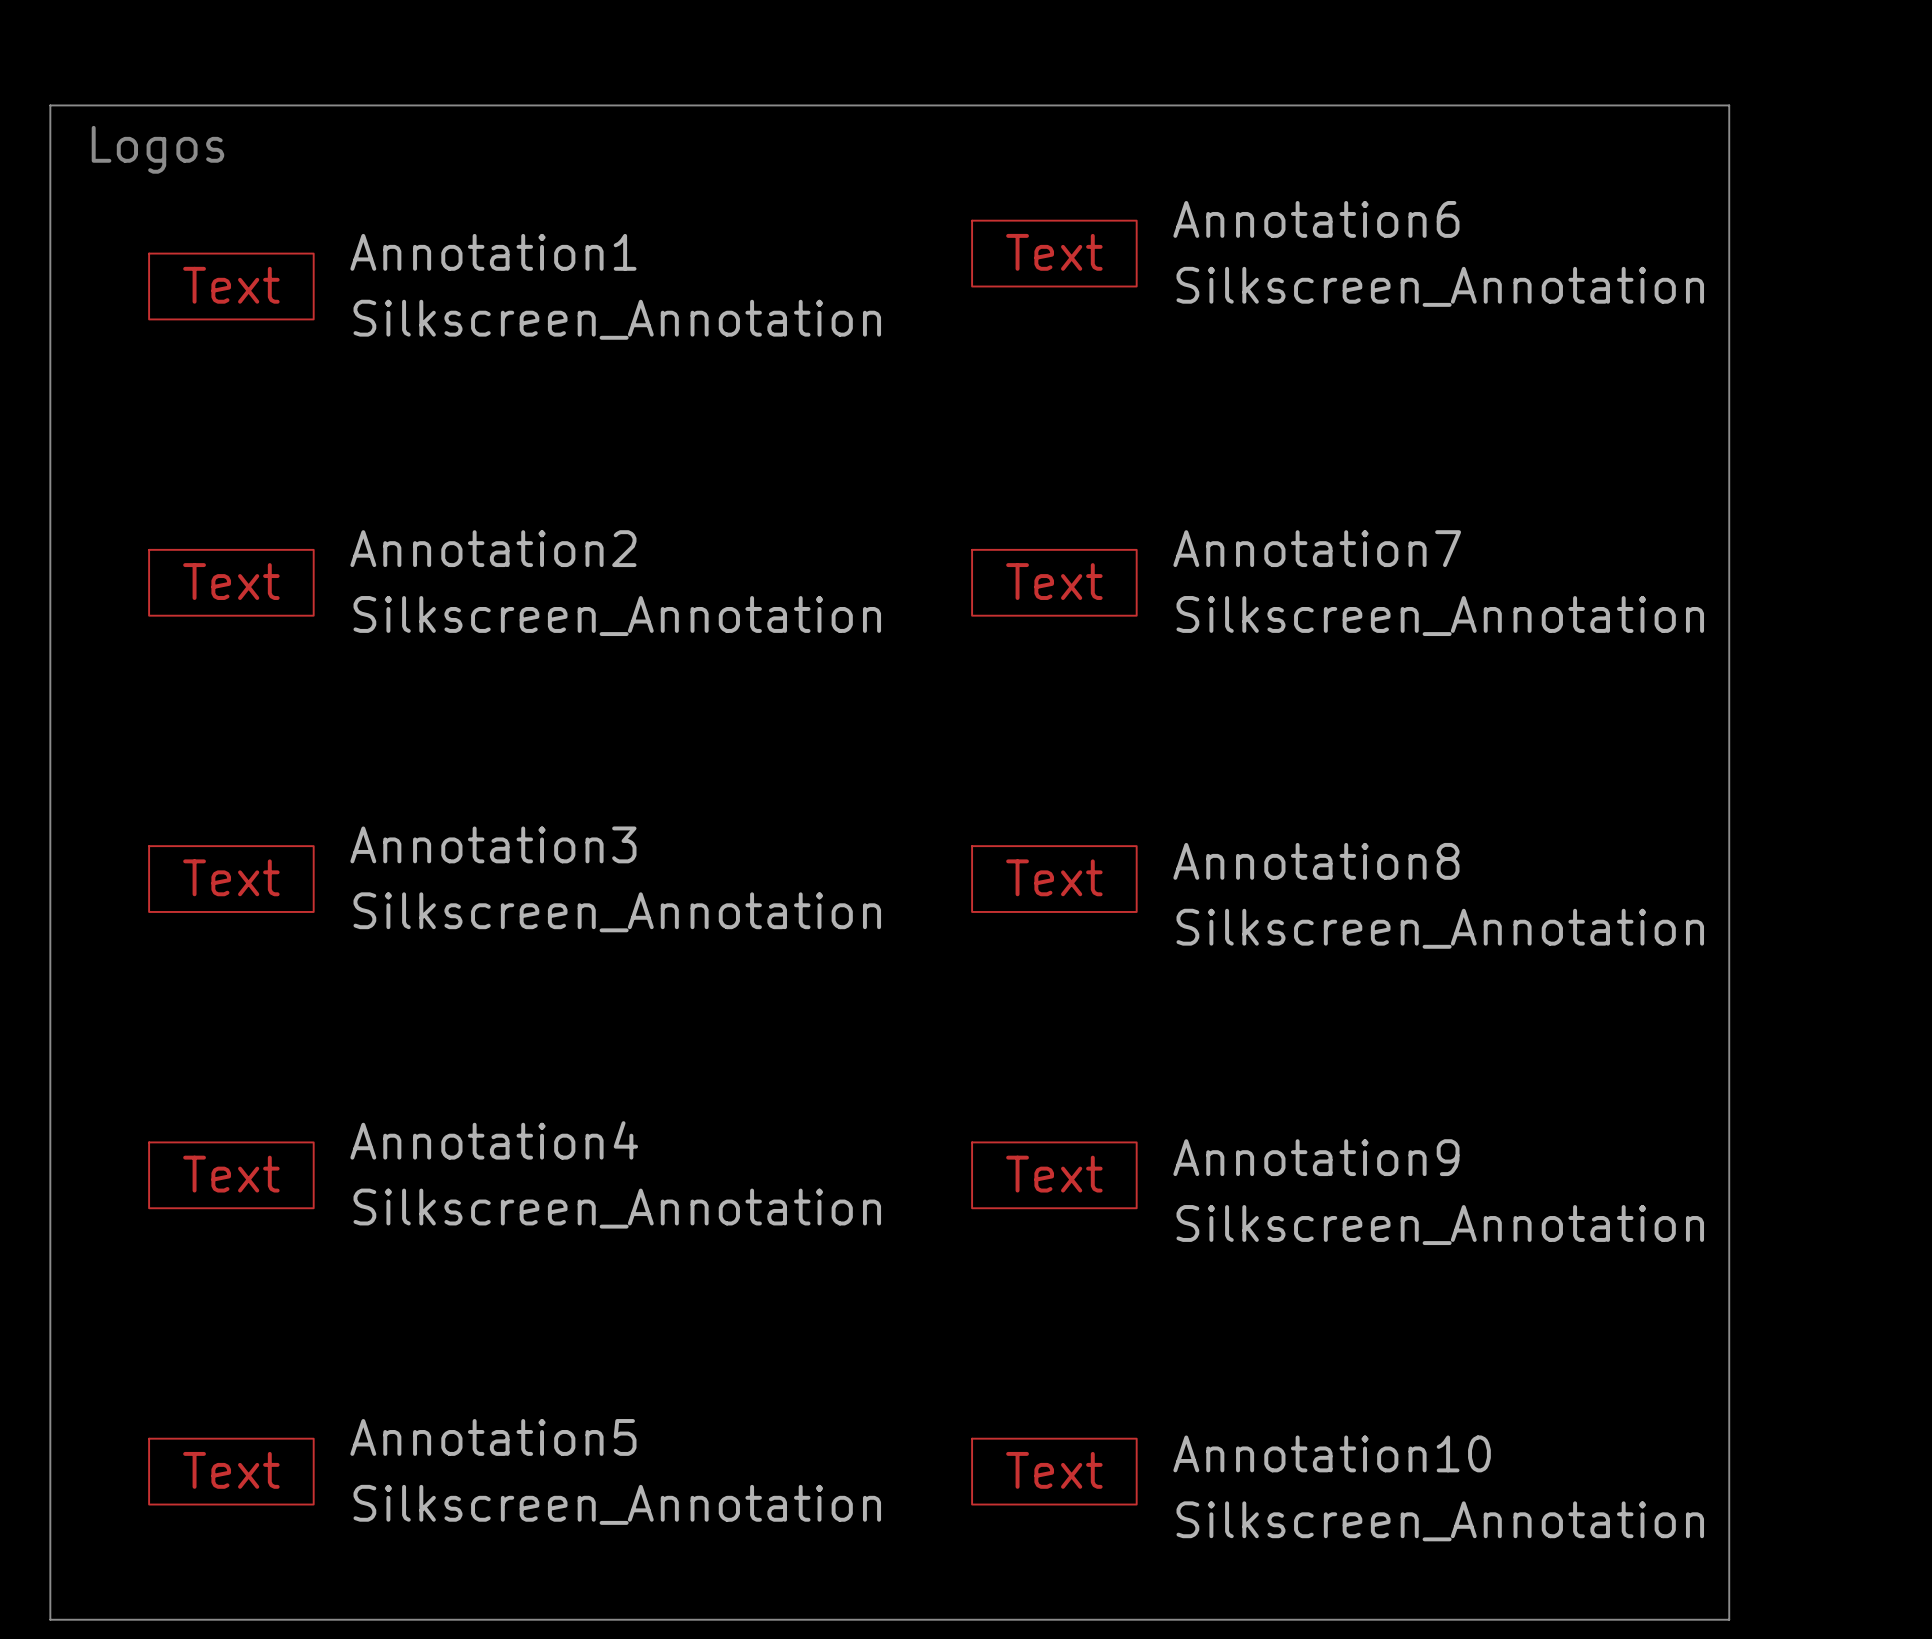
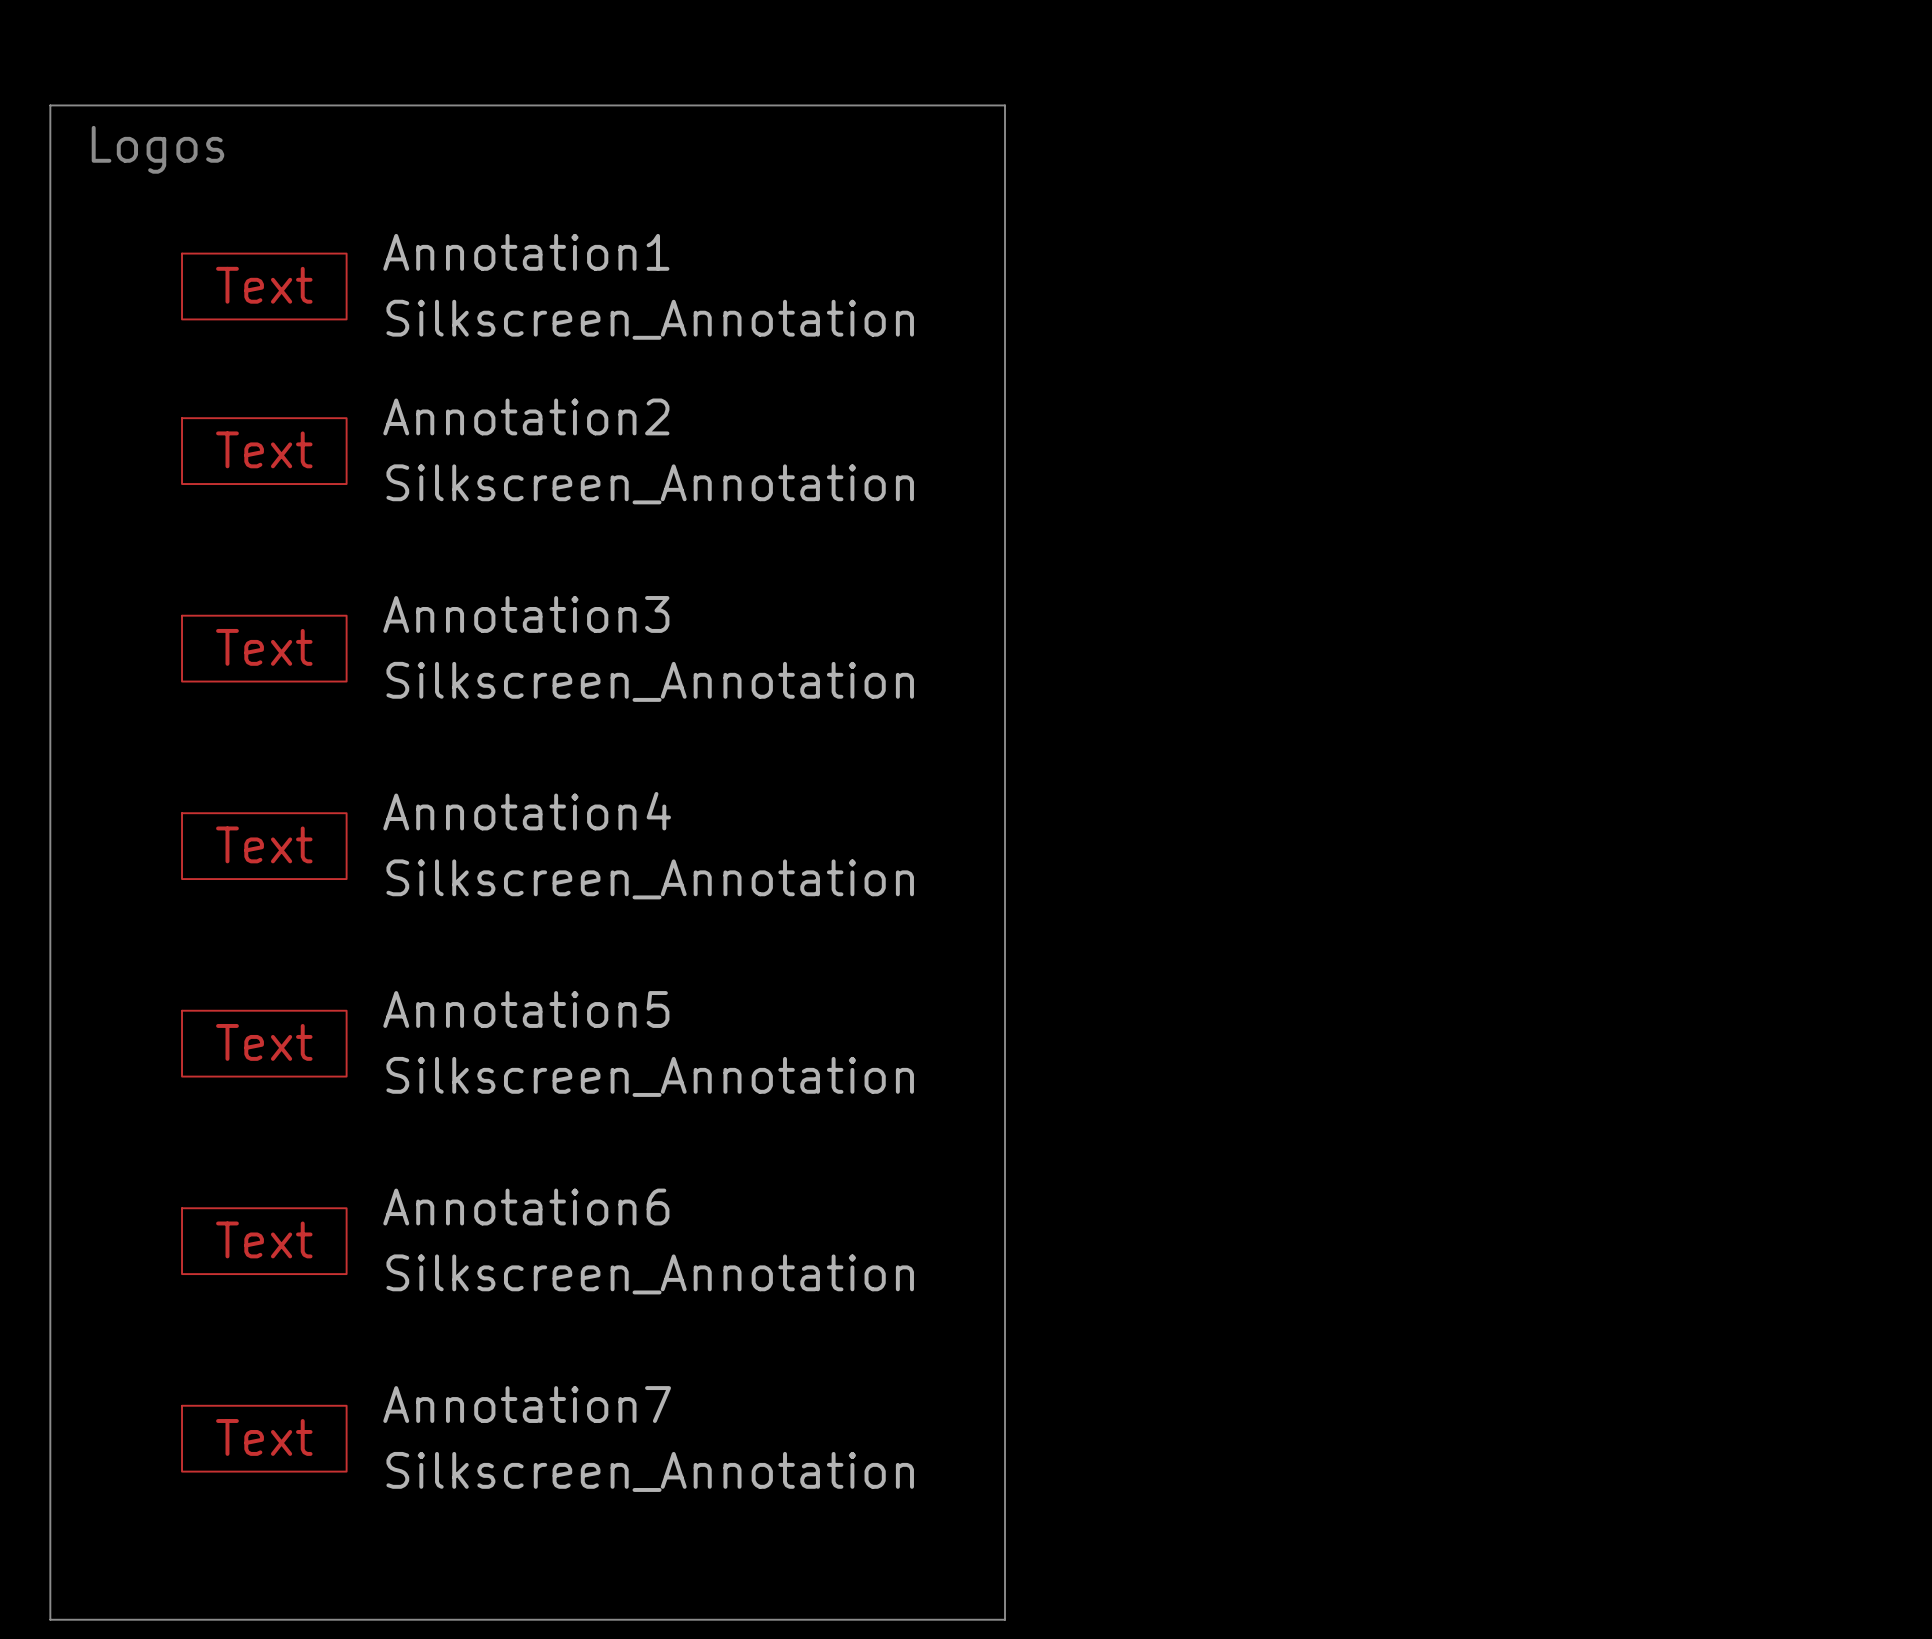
line: (1005, 105) (1729, 105) (1729, 1619) (1005, 1619) -> (1005, 105) (1005, 1619)
Annotation6 position: (1054, 253) -> (264, 1241)
Annotation1 position: (231, 286) -> (264, 286)
Annotation2 position: (231, 582) -> (264, 451)
Annotation7 position: (1054, 582) -> (264, 1438)
Annotation3 position: (231, 879) -> (264, 648)
Annotation8: Silkscreen_Annotation (1054, 879) -> none
Annotation4 position: (231, 1175) -> (264, 846)
Annotation9: Silkscreen_Annotation (1054, 1175) -> none
Annotation5 position: (231, 1471) -> (264, 1043)
Annotation10: Silkscreen_Annotation (1054, 1471) -> none

